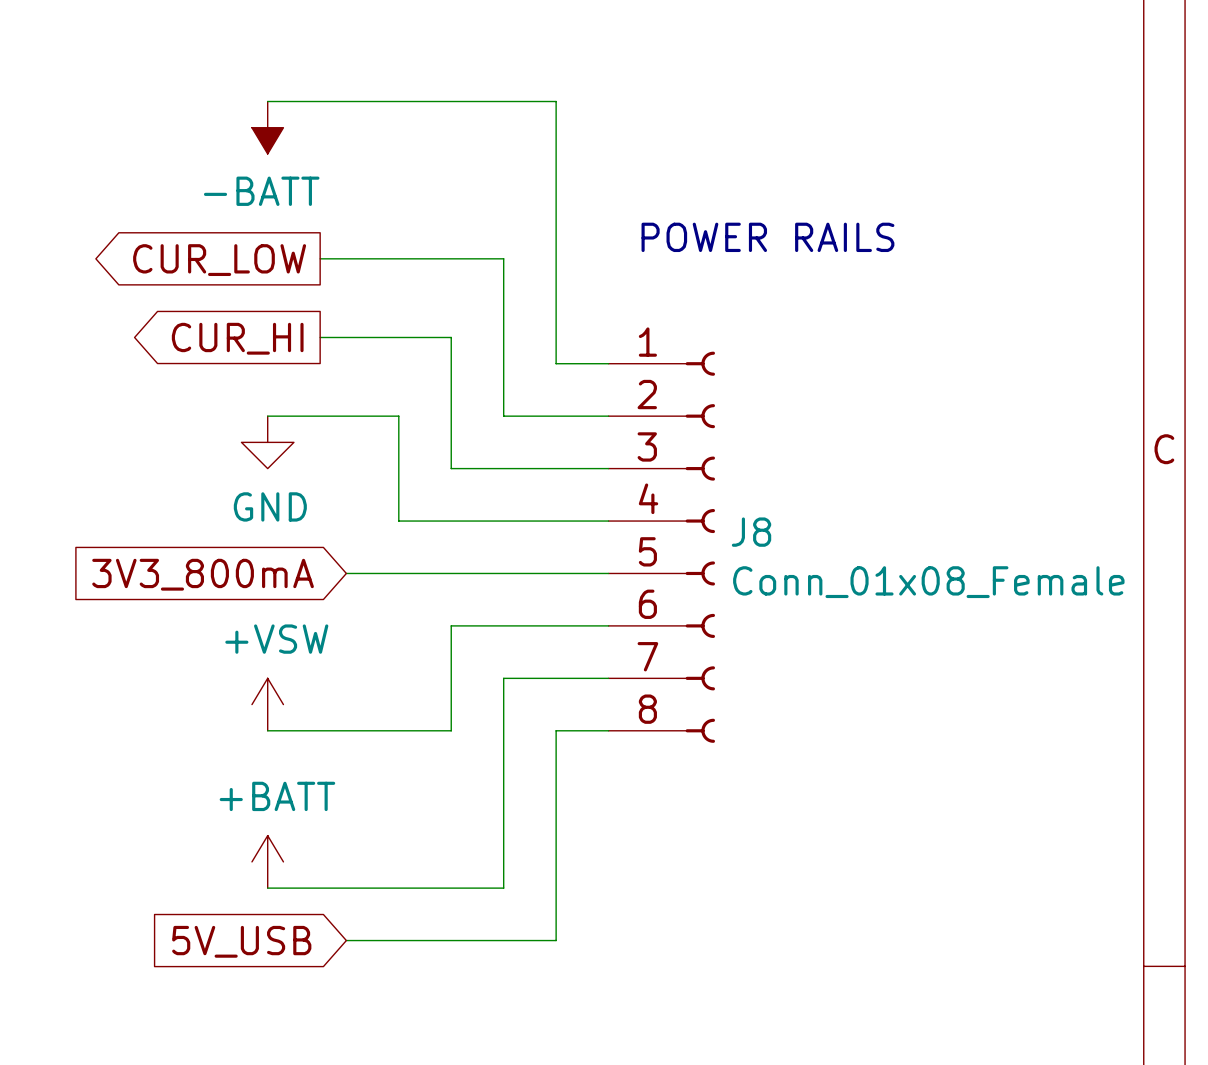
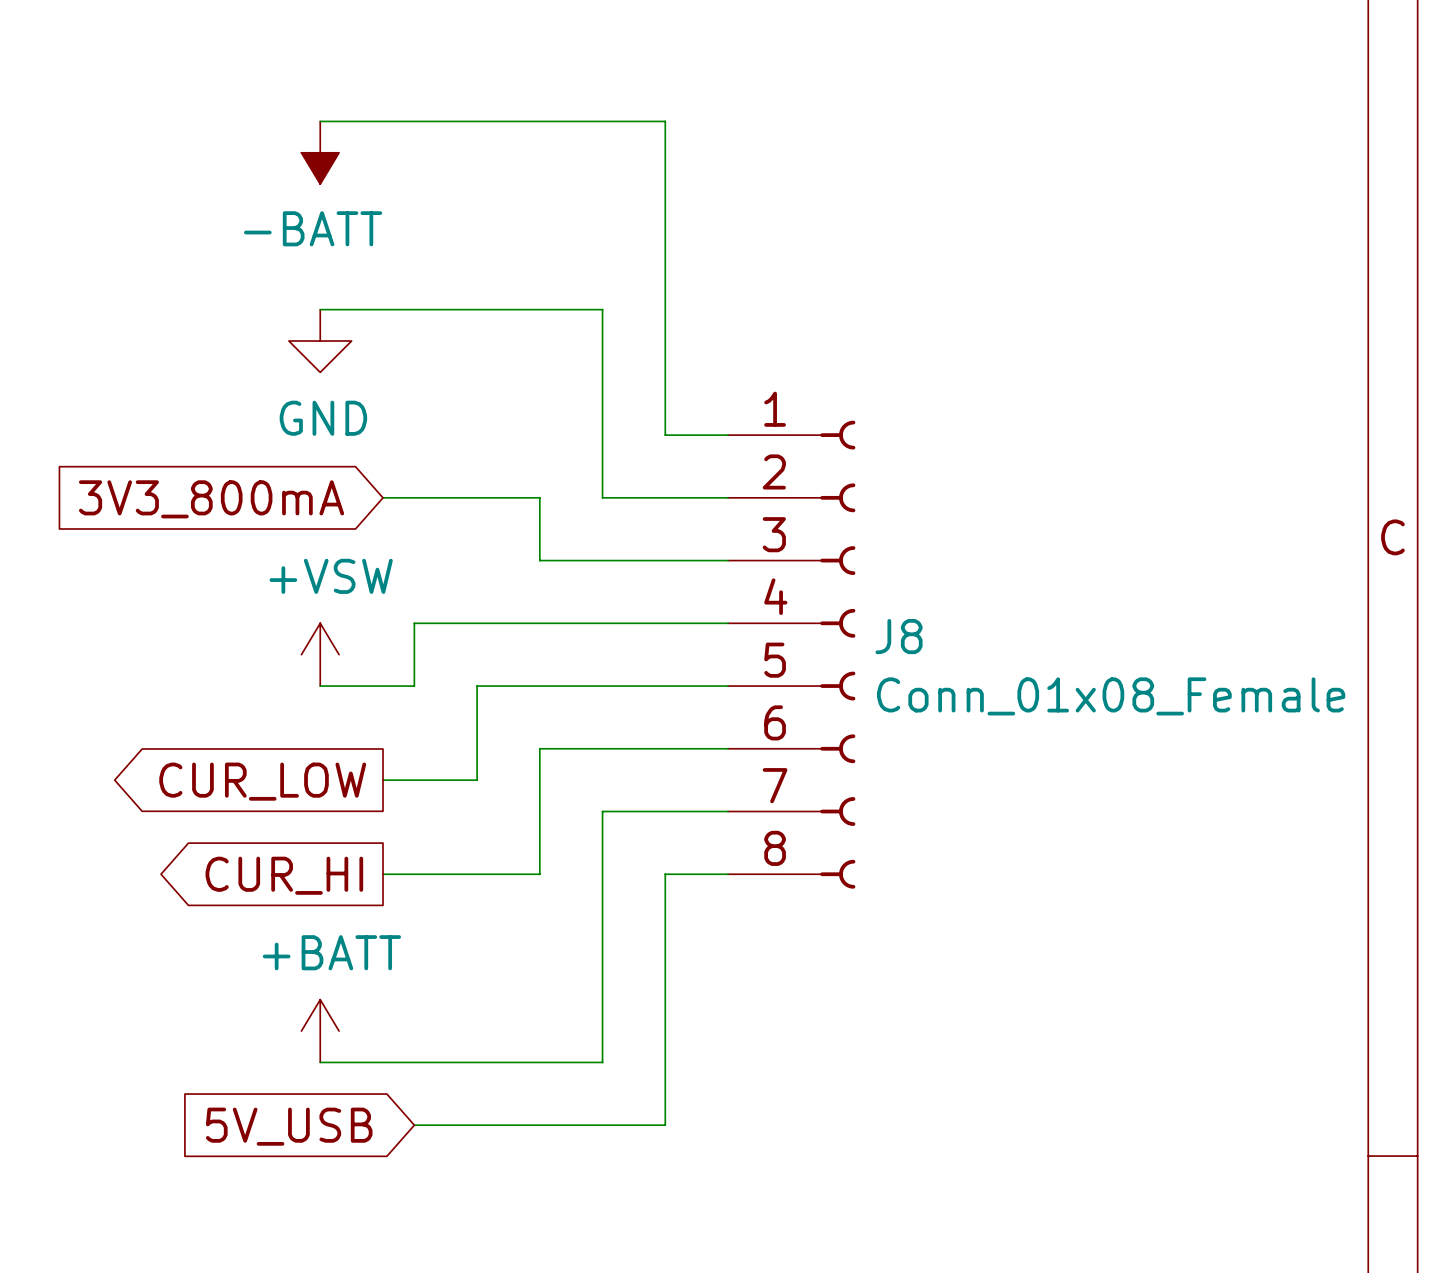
text: POWER RAILS (767, 237) -> none
global label position: CUR_LOW (219, 260) -> CUR_LOW (262, 781)
wire: (320, 337) (451, 337) (451, 416) -> (477, 497) (539, 497)
global label position: CUR_HI (237, 338) -> CUR_HI (284, 875)
wire: (267, 416) (320, 416) -> (320, 309) (382, 309)
wire: (398, 416) (398, 521) -> (320, 686) (414, 686) (414, 623) (477, 623)
power symbol position: GND (267, 442) -> GND (320, 341)
wire: (346, 573) (398, 573) -> (382, 780) (477, 780) (477, 686)
global label position: 3V3_800mA (203, 574) -> 3V3_800mA (211, 499)
power symbol position: +VSW (267, 704) -> +VSW (320, 654)
wire: (267, 730) (320, 730) -> none

